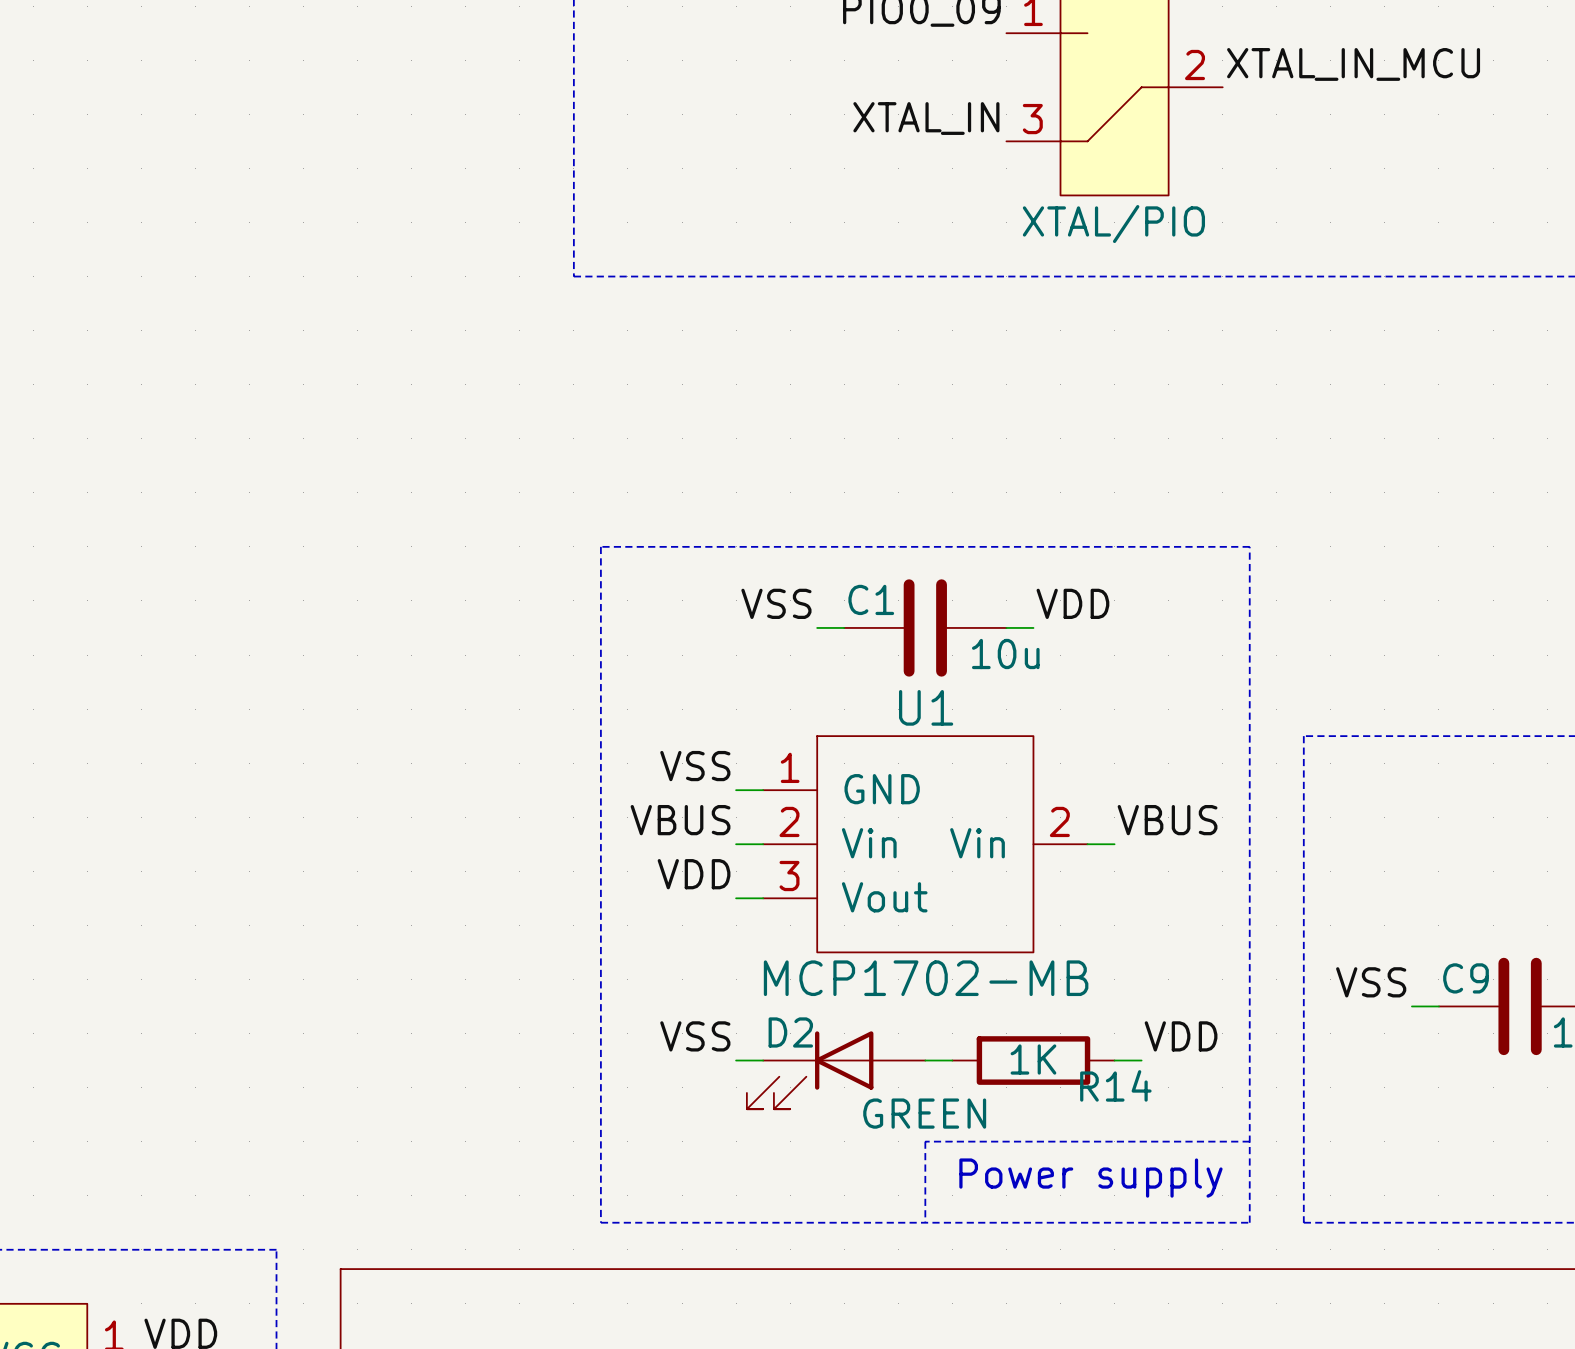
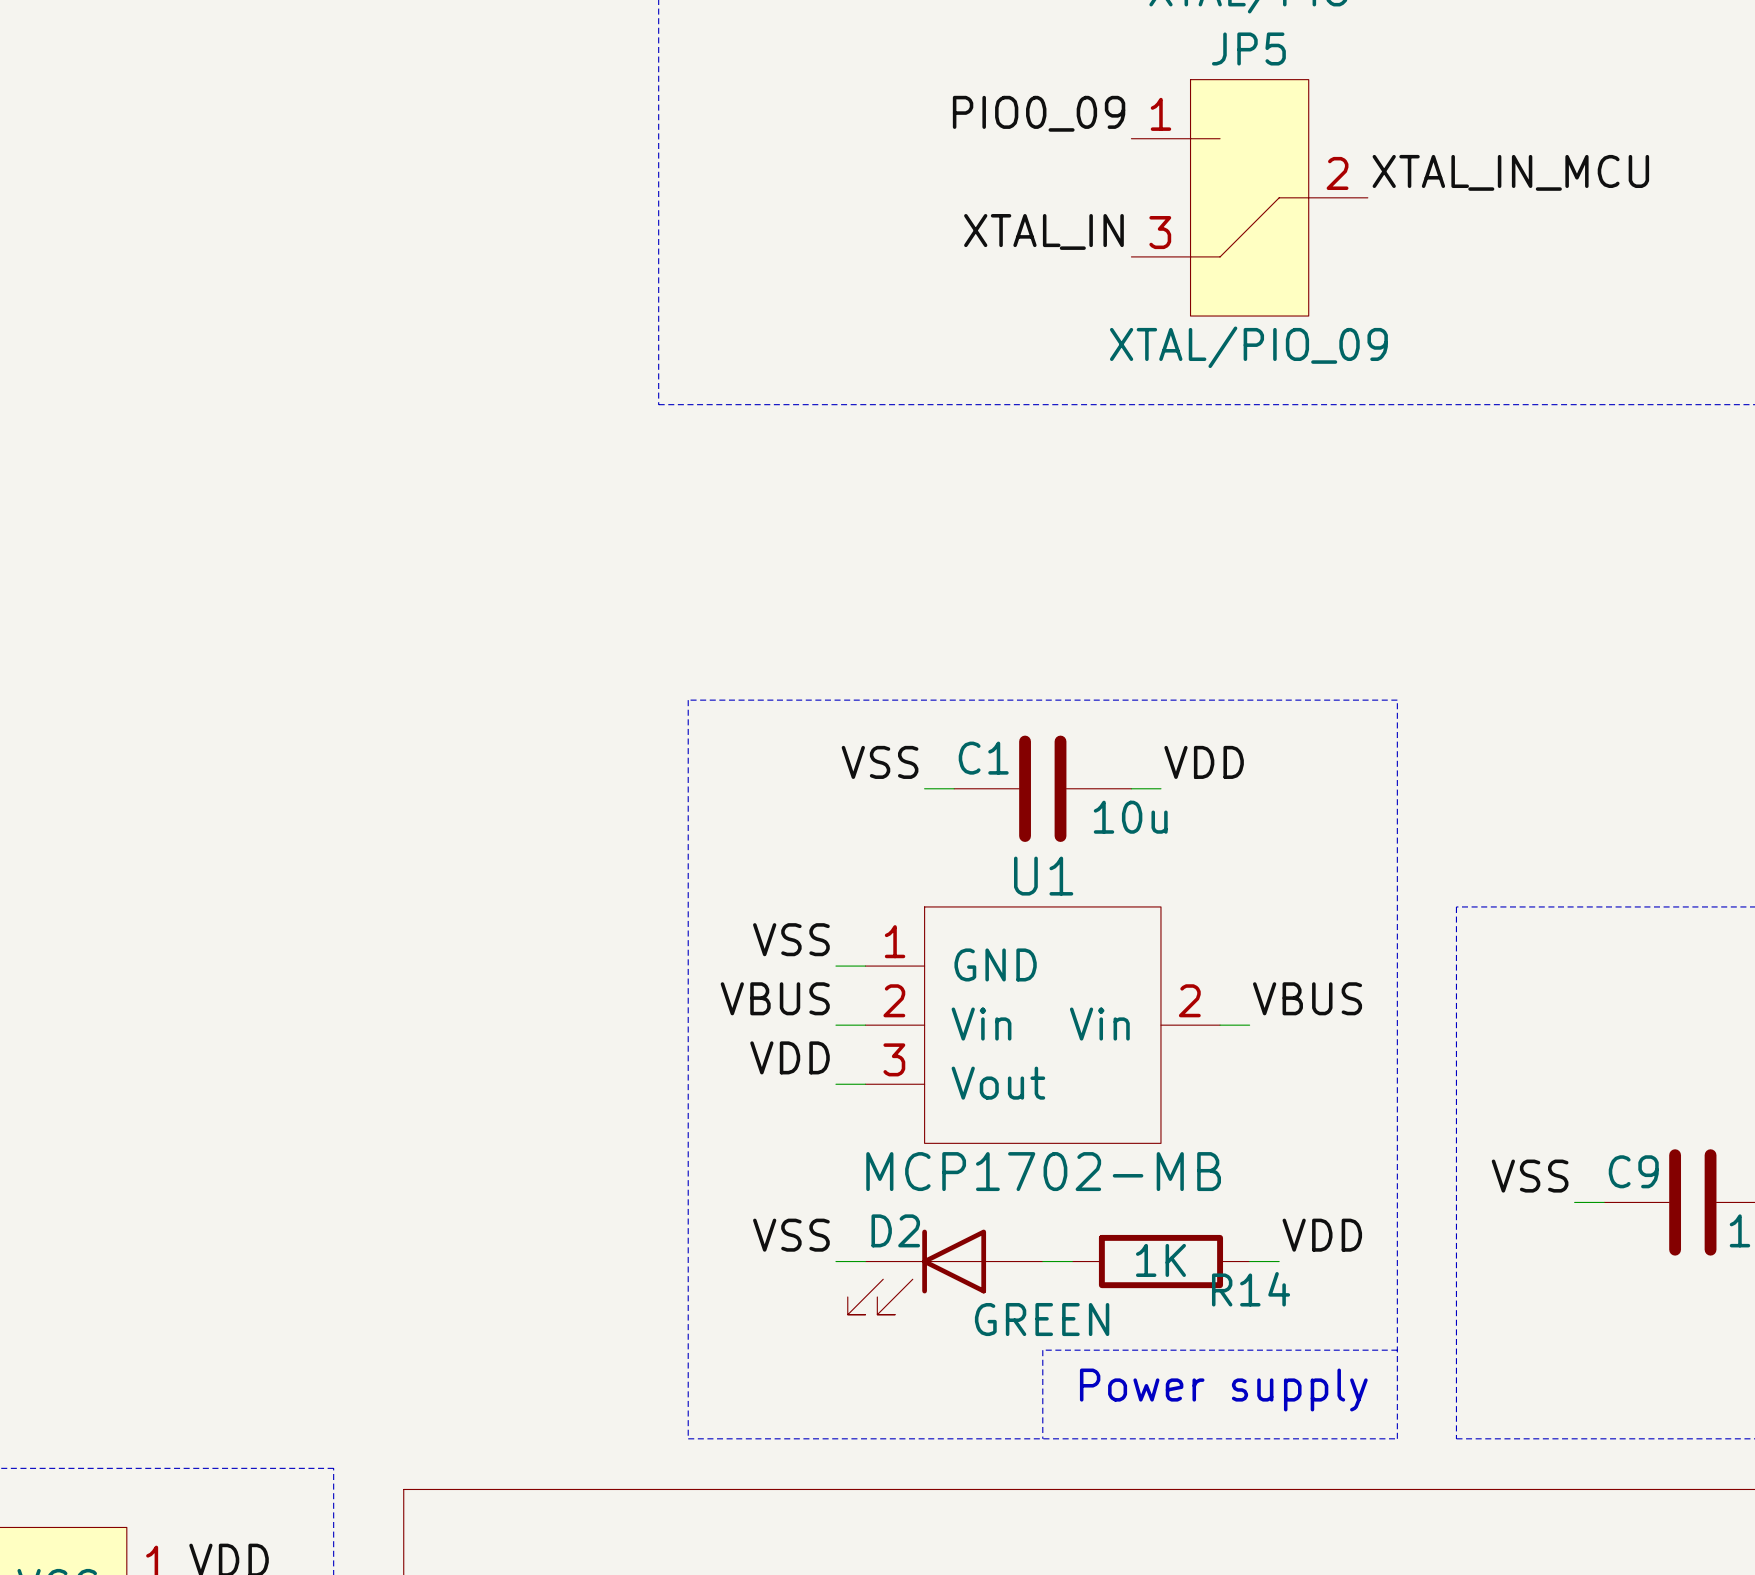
JP5 value: XTAL/PIO (1113, 224) -> XTAL/PIO_09 (1248, 347)

